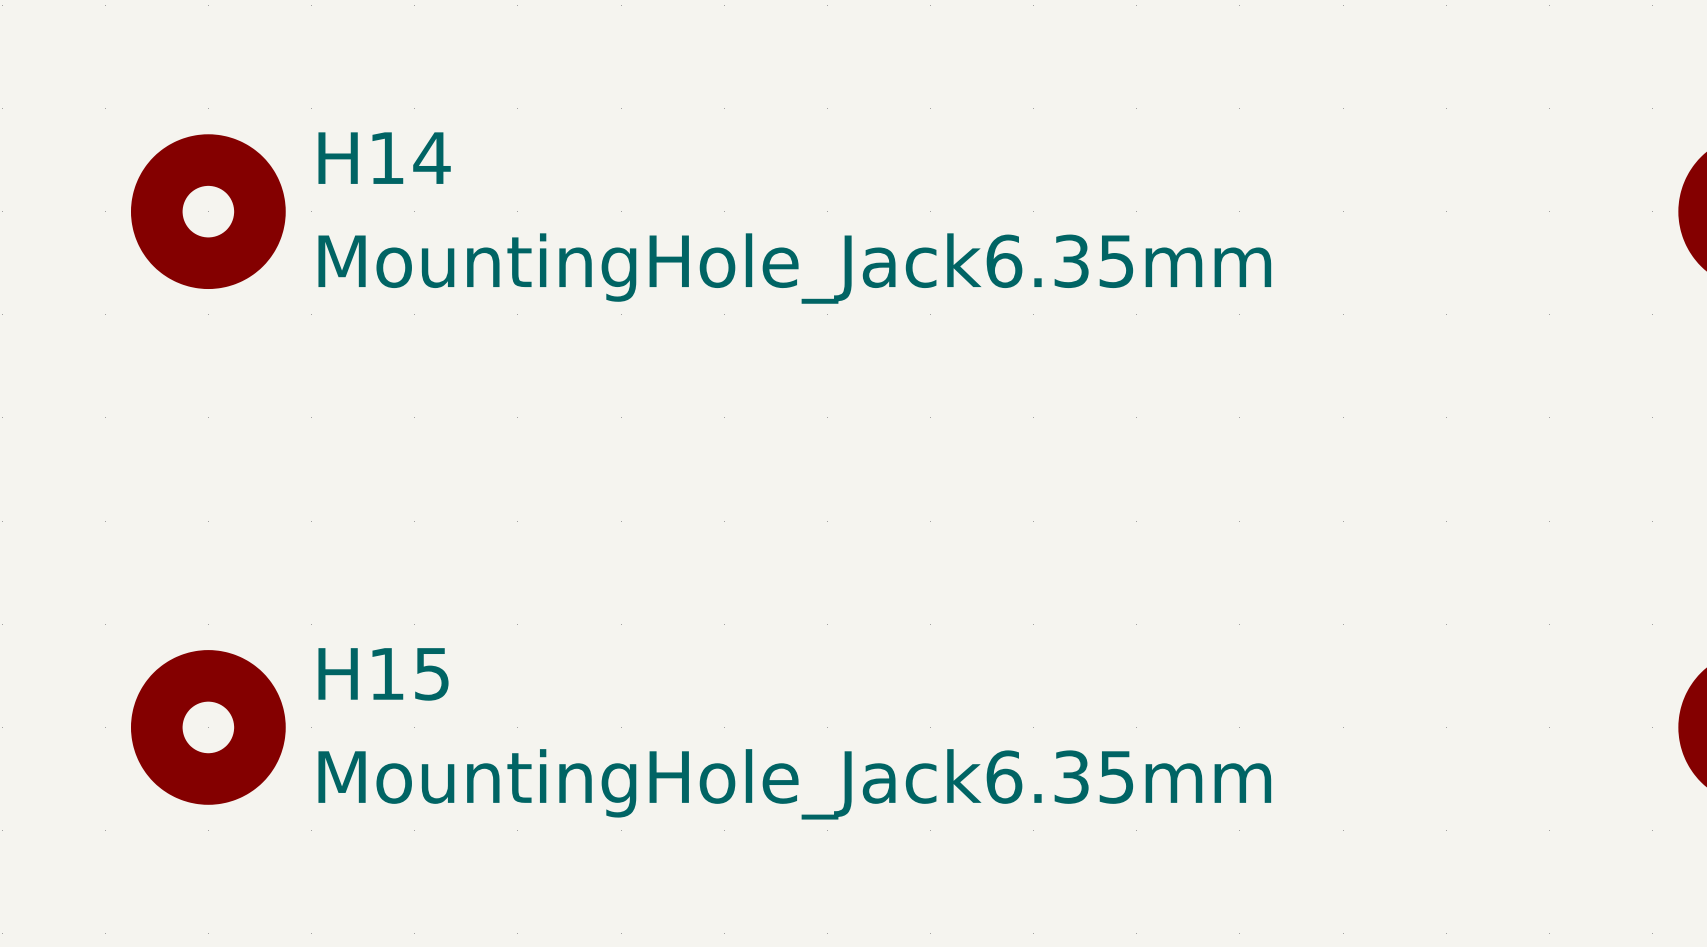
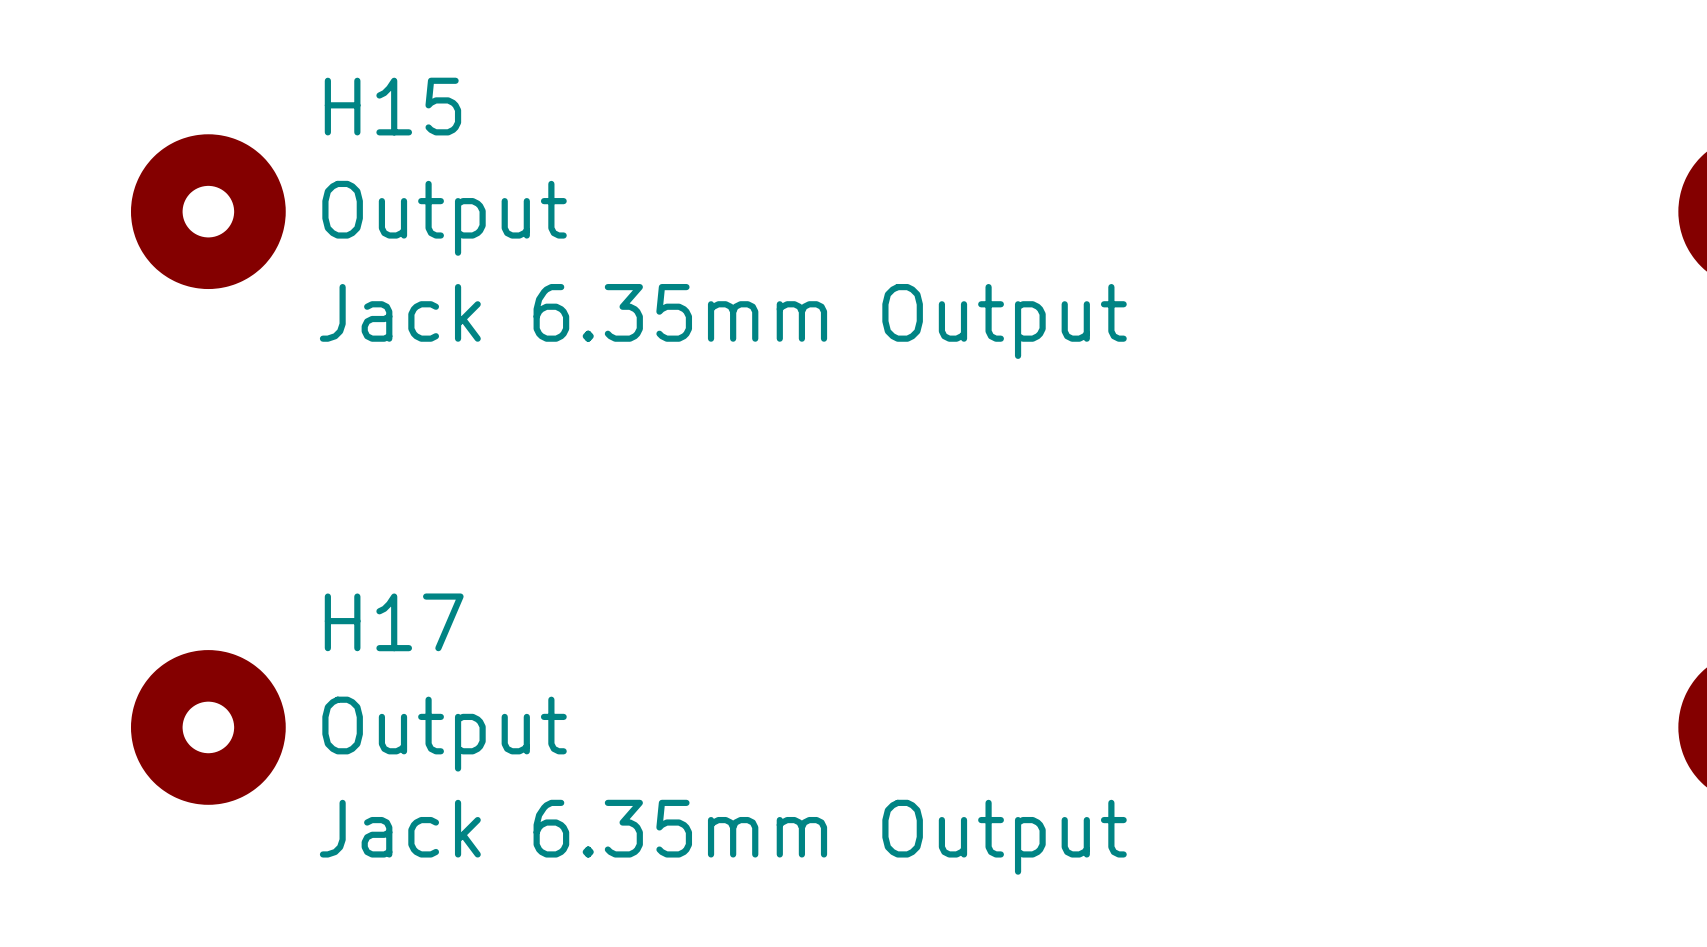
H14 name: H14 (384, 158) -> H15 (392, 106)
H14 value: MountingHole_Jack6.35mm (794, 268) -> Output (444, 218)
H14 text: none -> Jack 6.35mm Output (723, 321)
H15 name: H15 (383, 674) -> H17 (394, 622)
H15 value: MountingHole_Jack6.35mm (794, 784) -> Output (444, 734)
H15 text: none -> Jack 6.35mm Output (723, 837)

